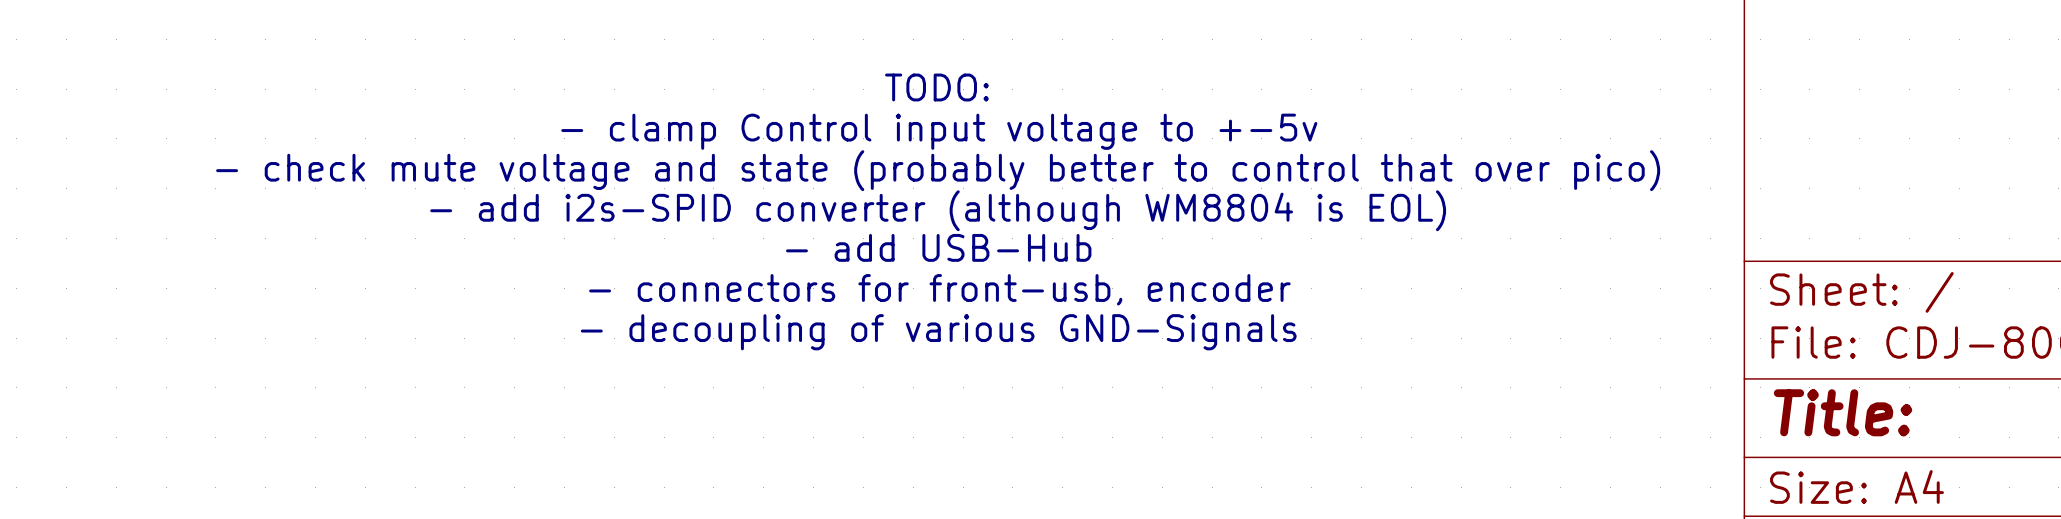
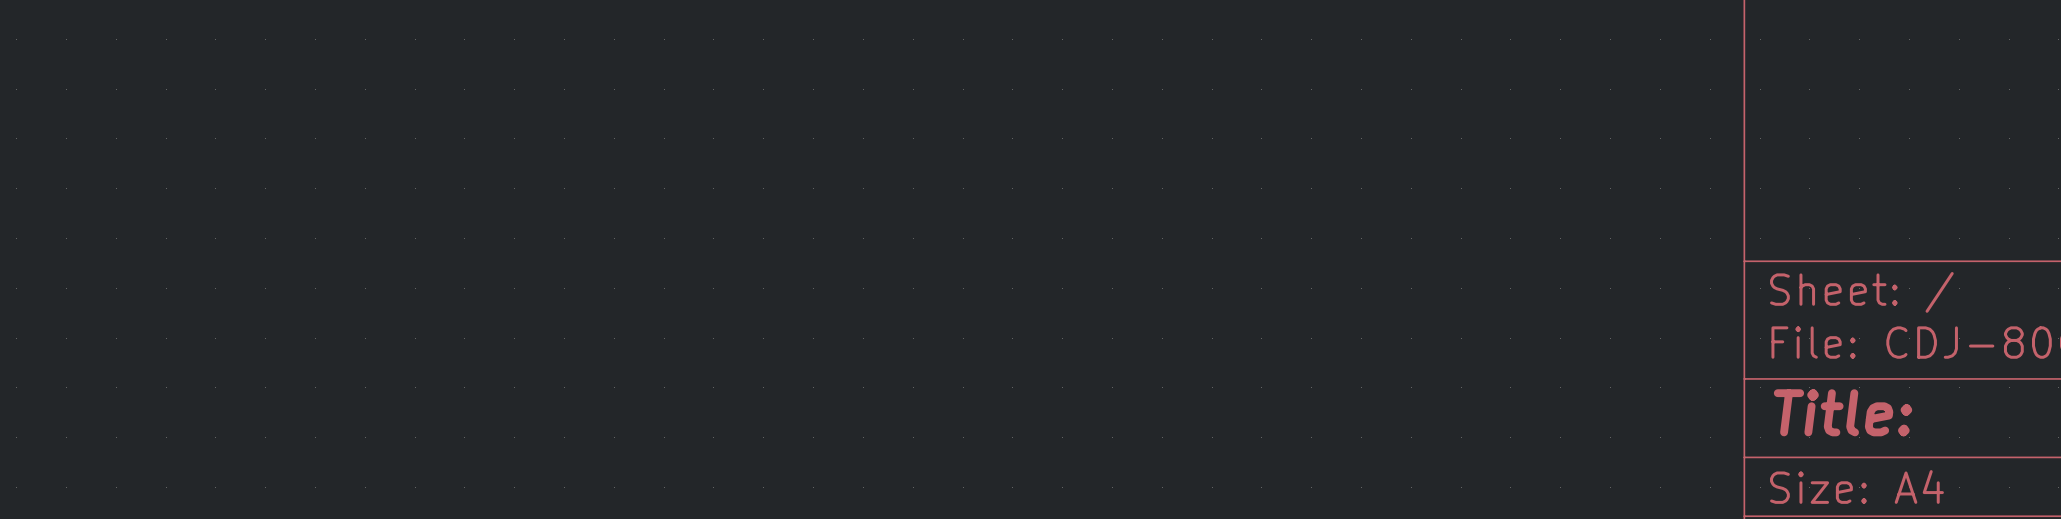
text: TODO: (936, 87) -> none
text: - clamp Control input voltage to +-5v (939, 131) -> none
text: - check mute voltage and state (probably better to control that over pico) (938, 170) -> none
text: - add i2s-SPID converter (although WM8804 is EOL) (938, 210) -> none
text: - add USB-Hub (938, 247) -> none
text: - connectors for front-usb, encoder (939, 289) -> none
text: - decoupling of various GND-Signals (938, 332) -> none

